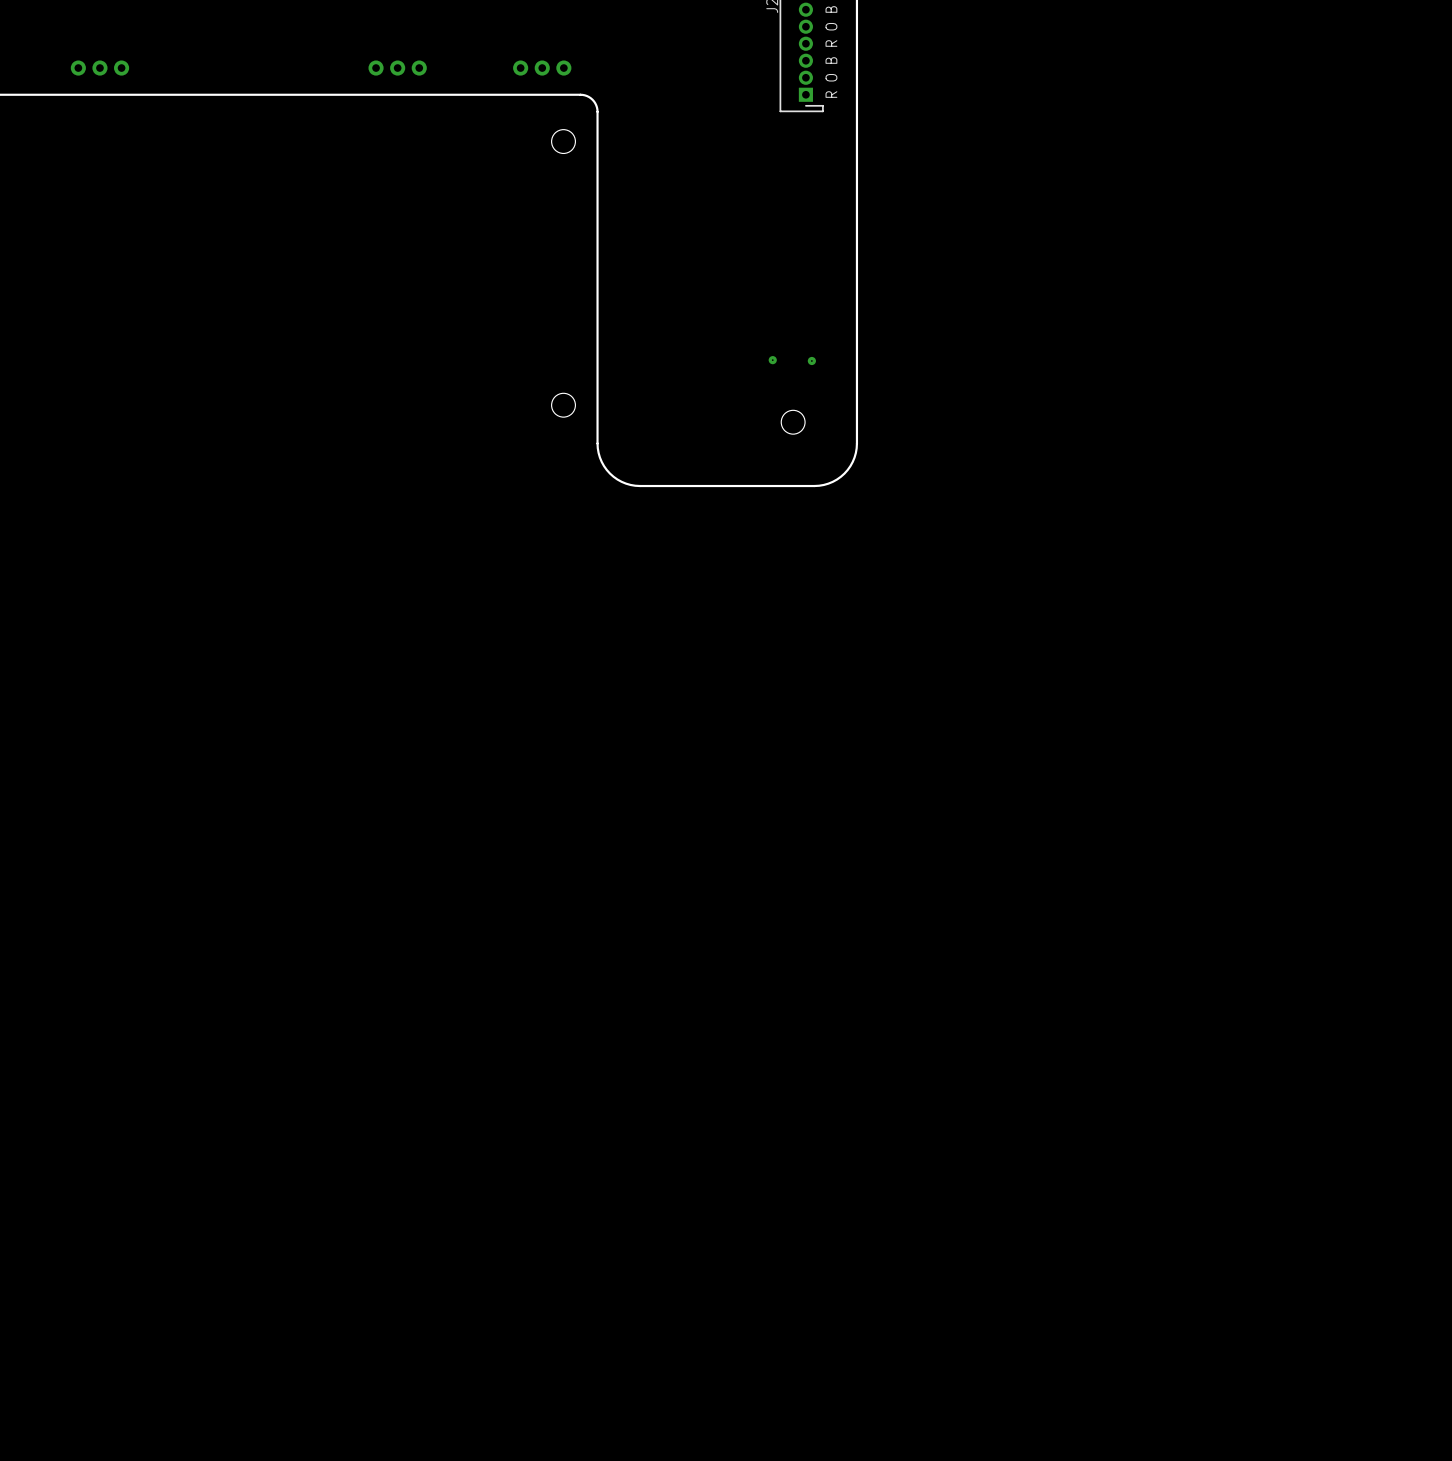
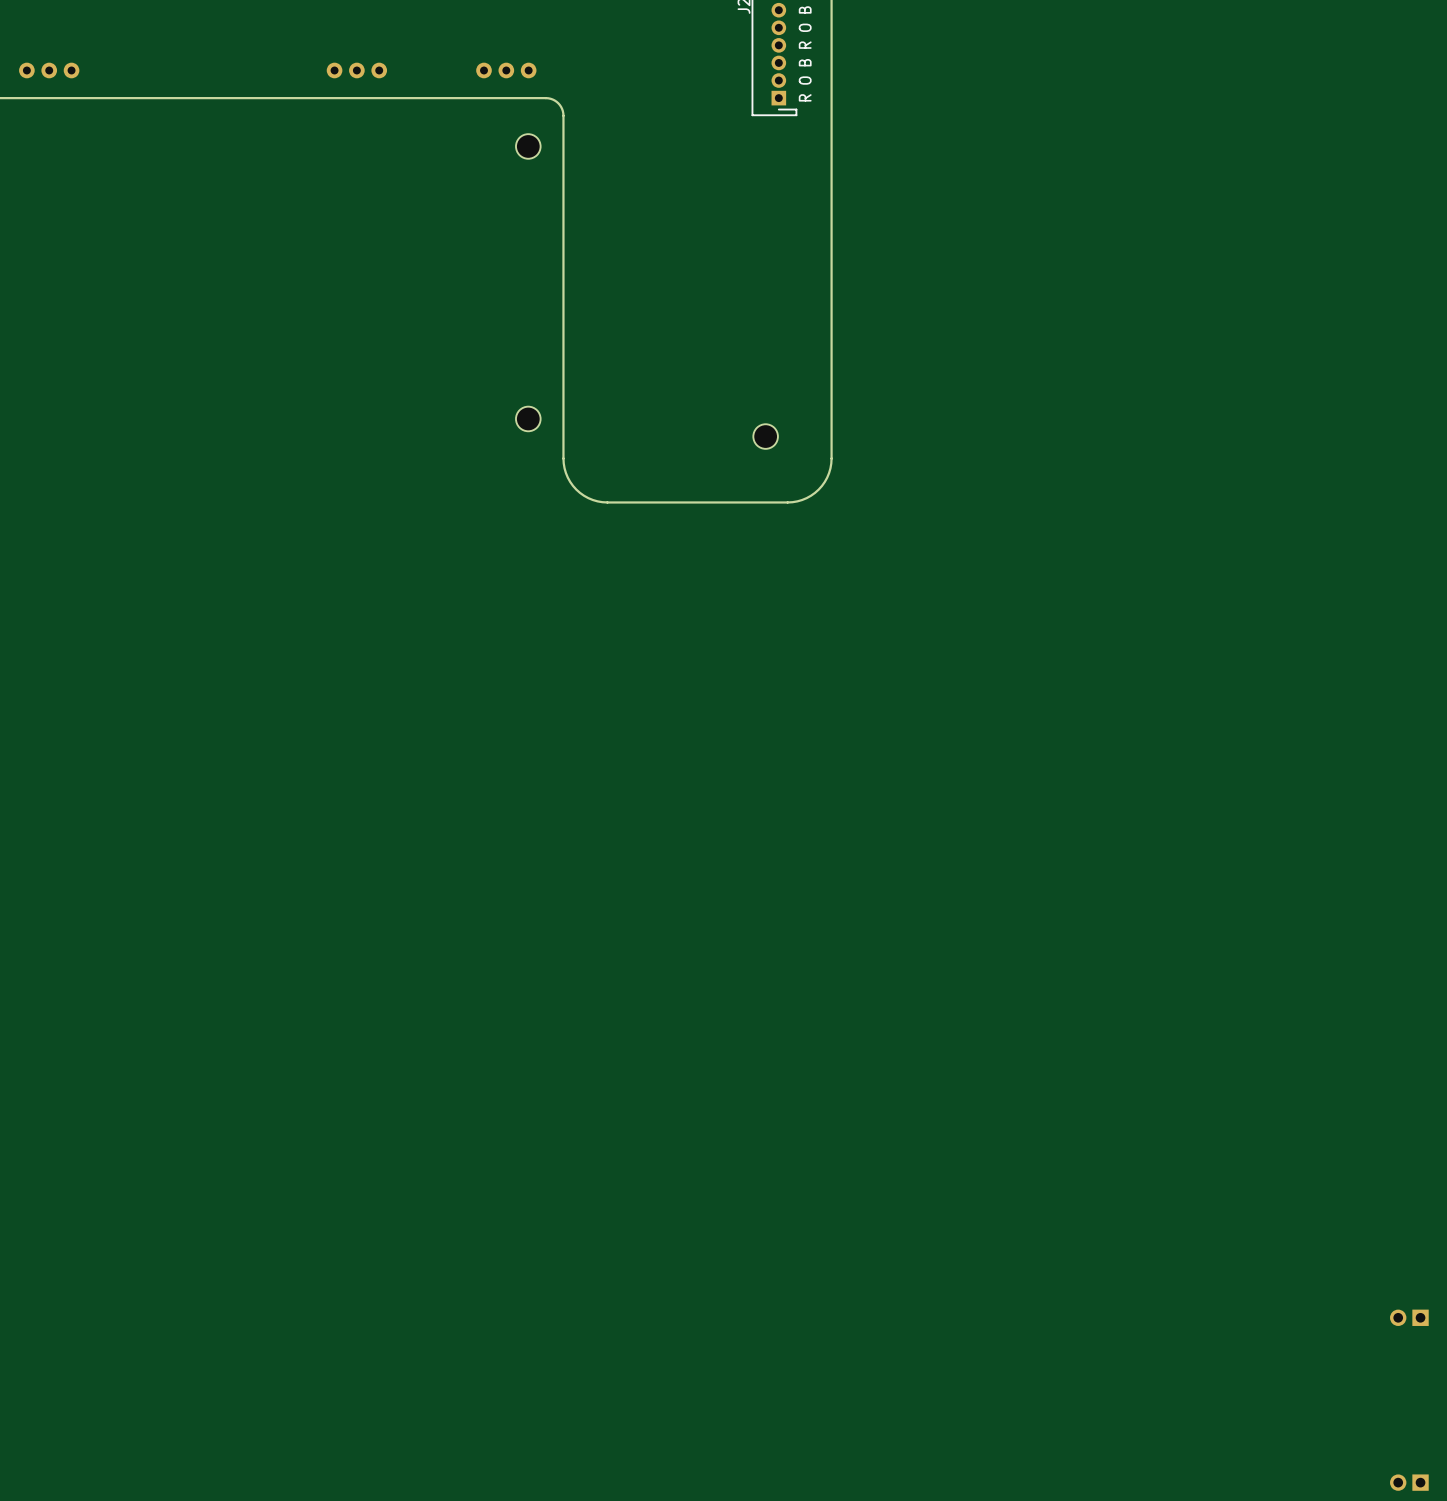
part: (772, 360) -> none
part: (811, 360) -> none
part: none -> (1409, 1317)
part: none -> (1409, 1482)

